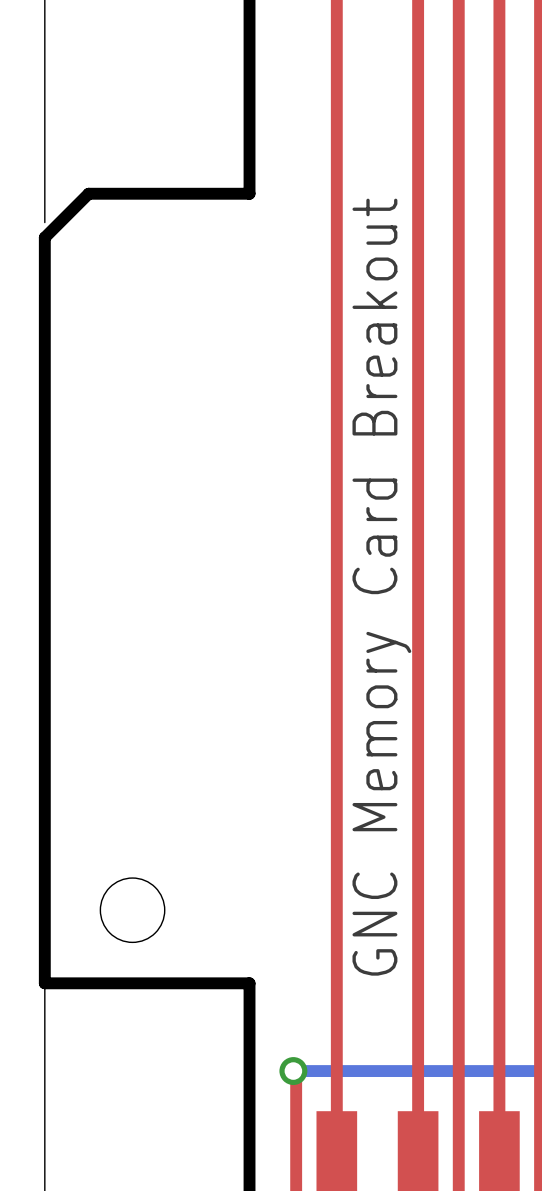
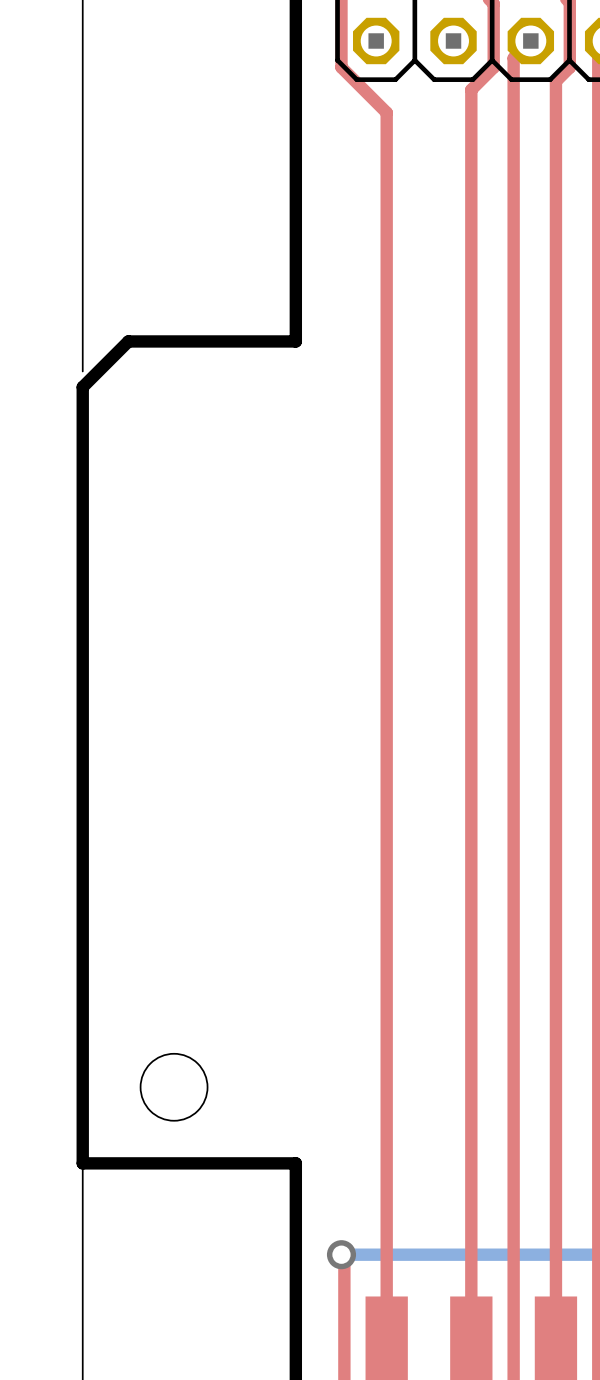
text: GNC Memory Card Breakout (381, 587) -> none

